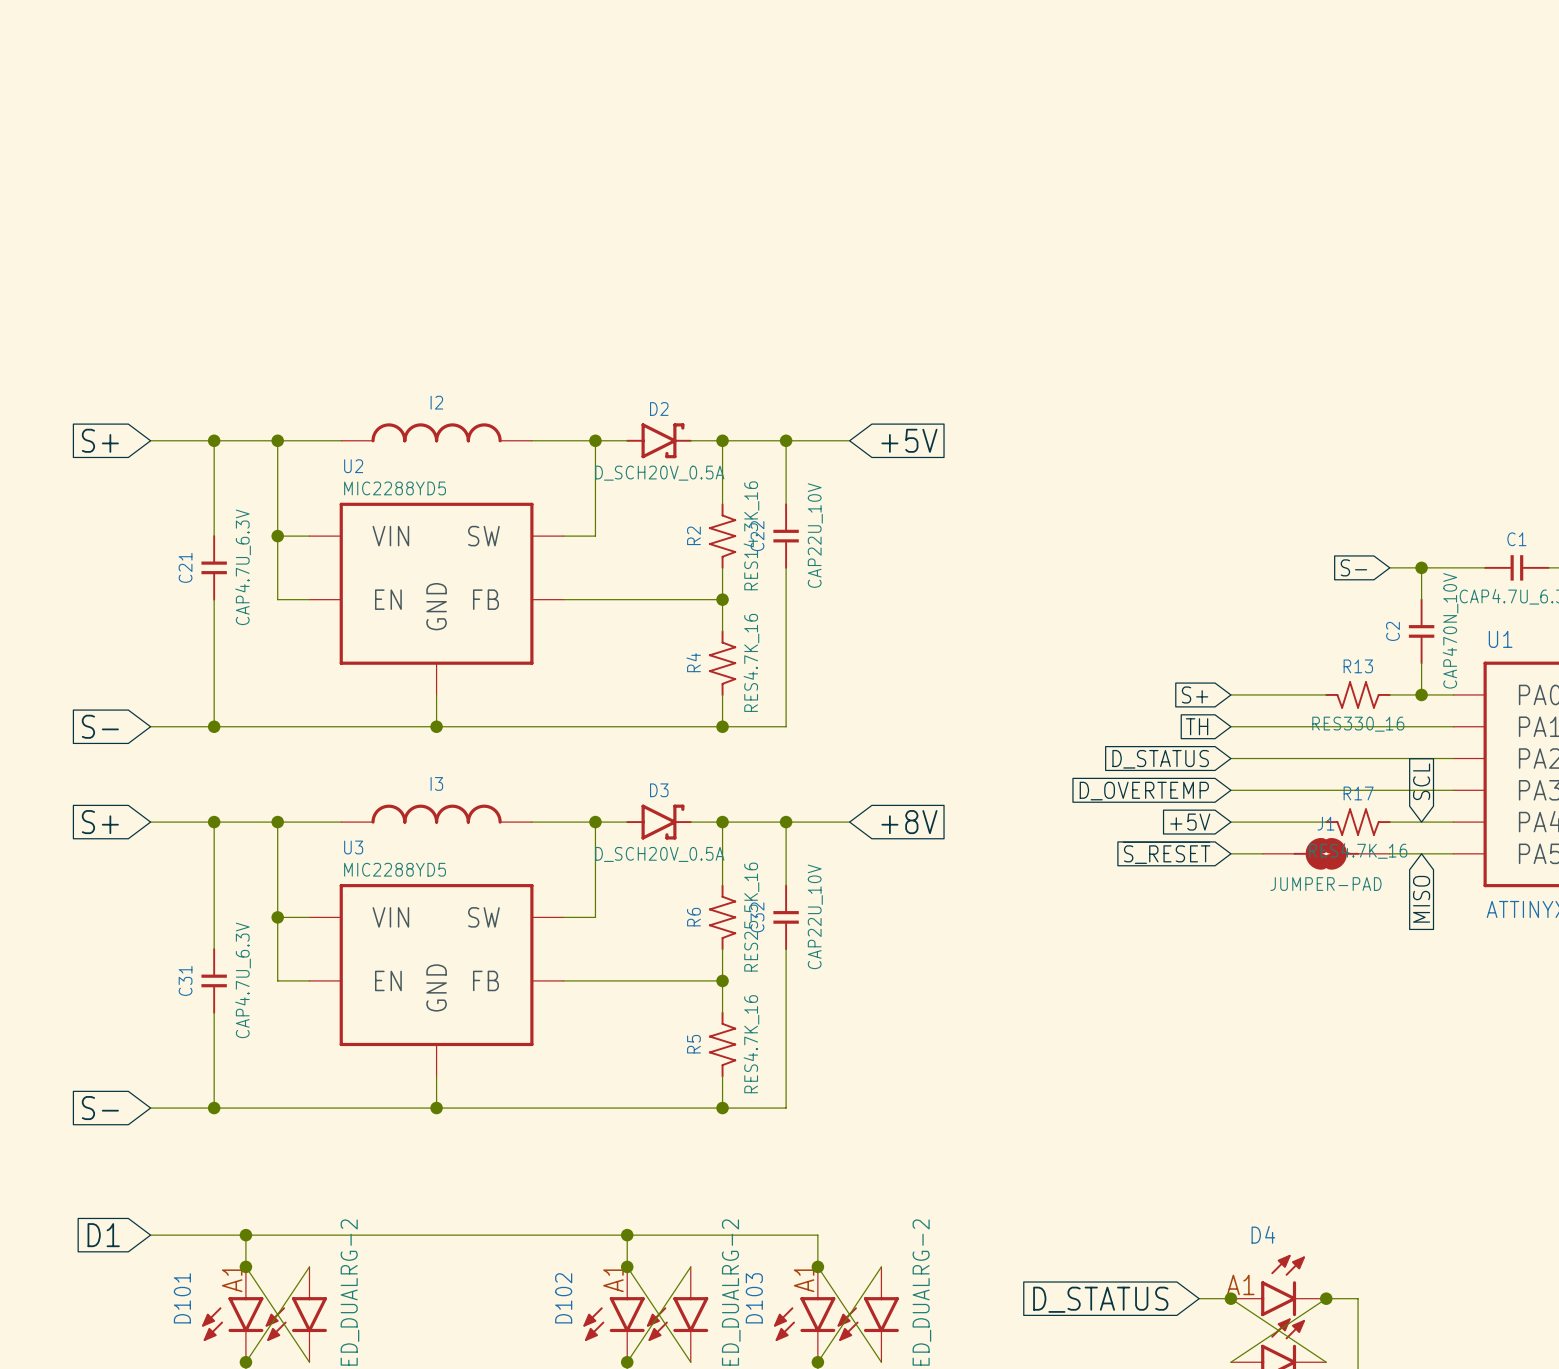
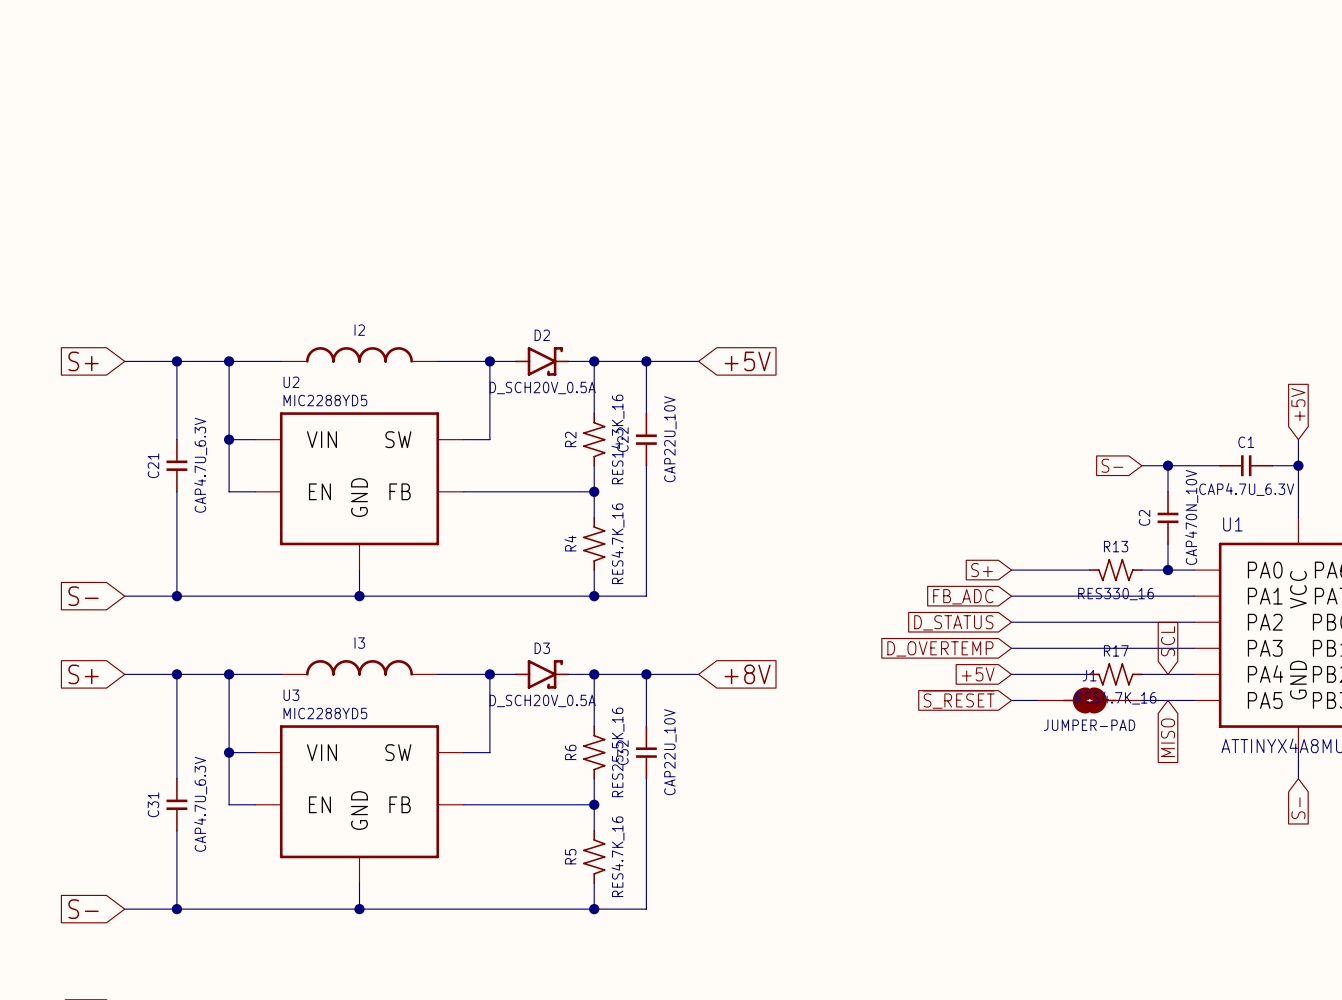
global label: TH (1197, 726) -> FB_ADC (963, 596)

